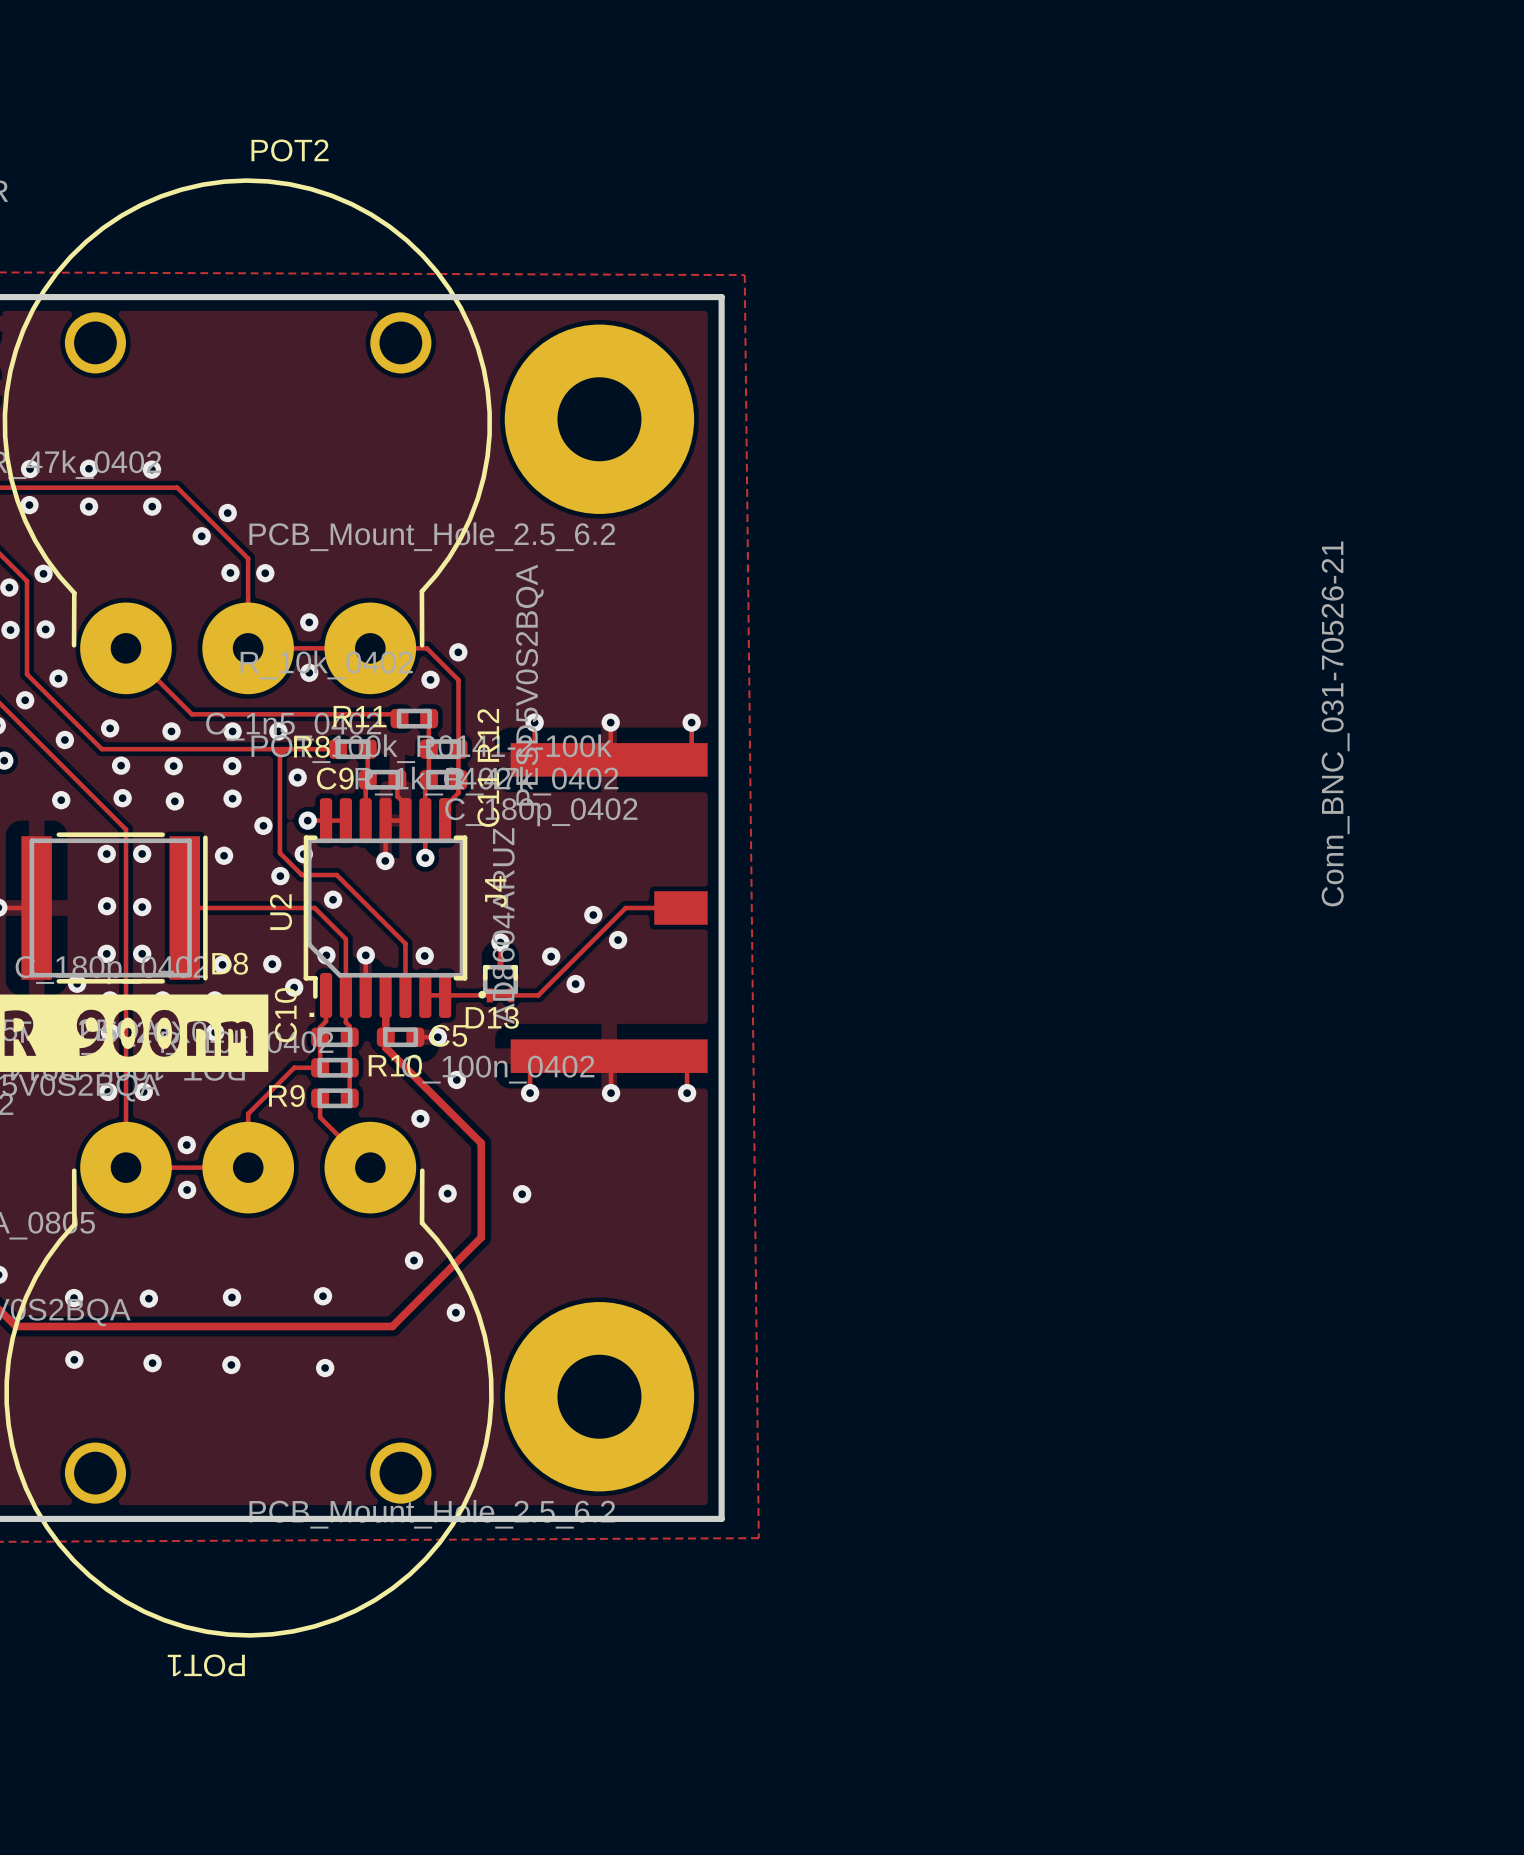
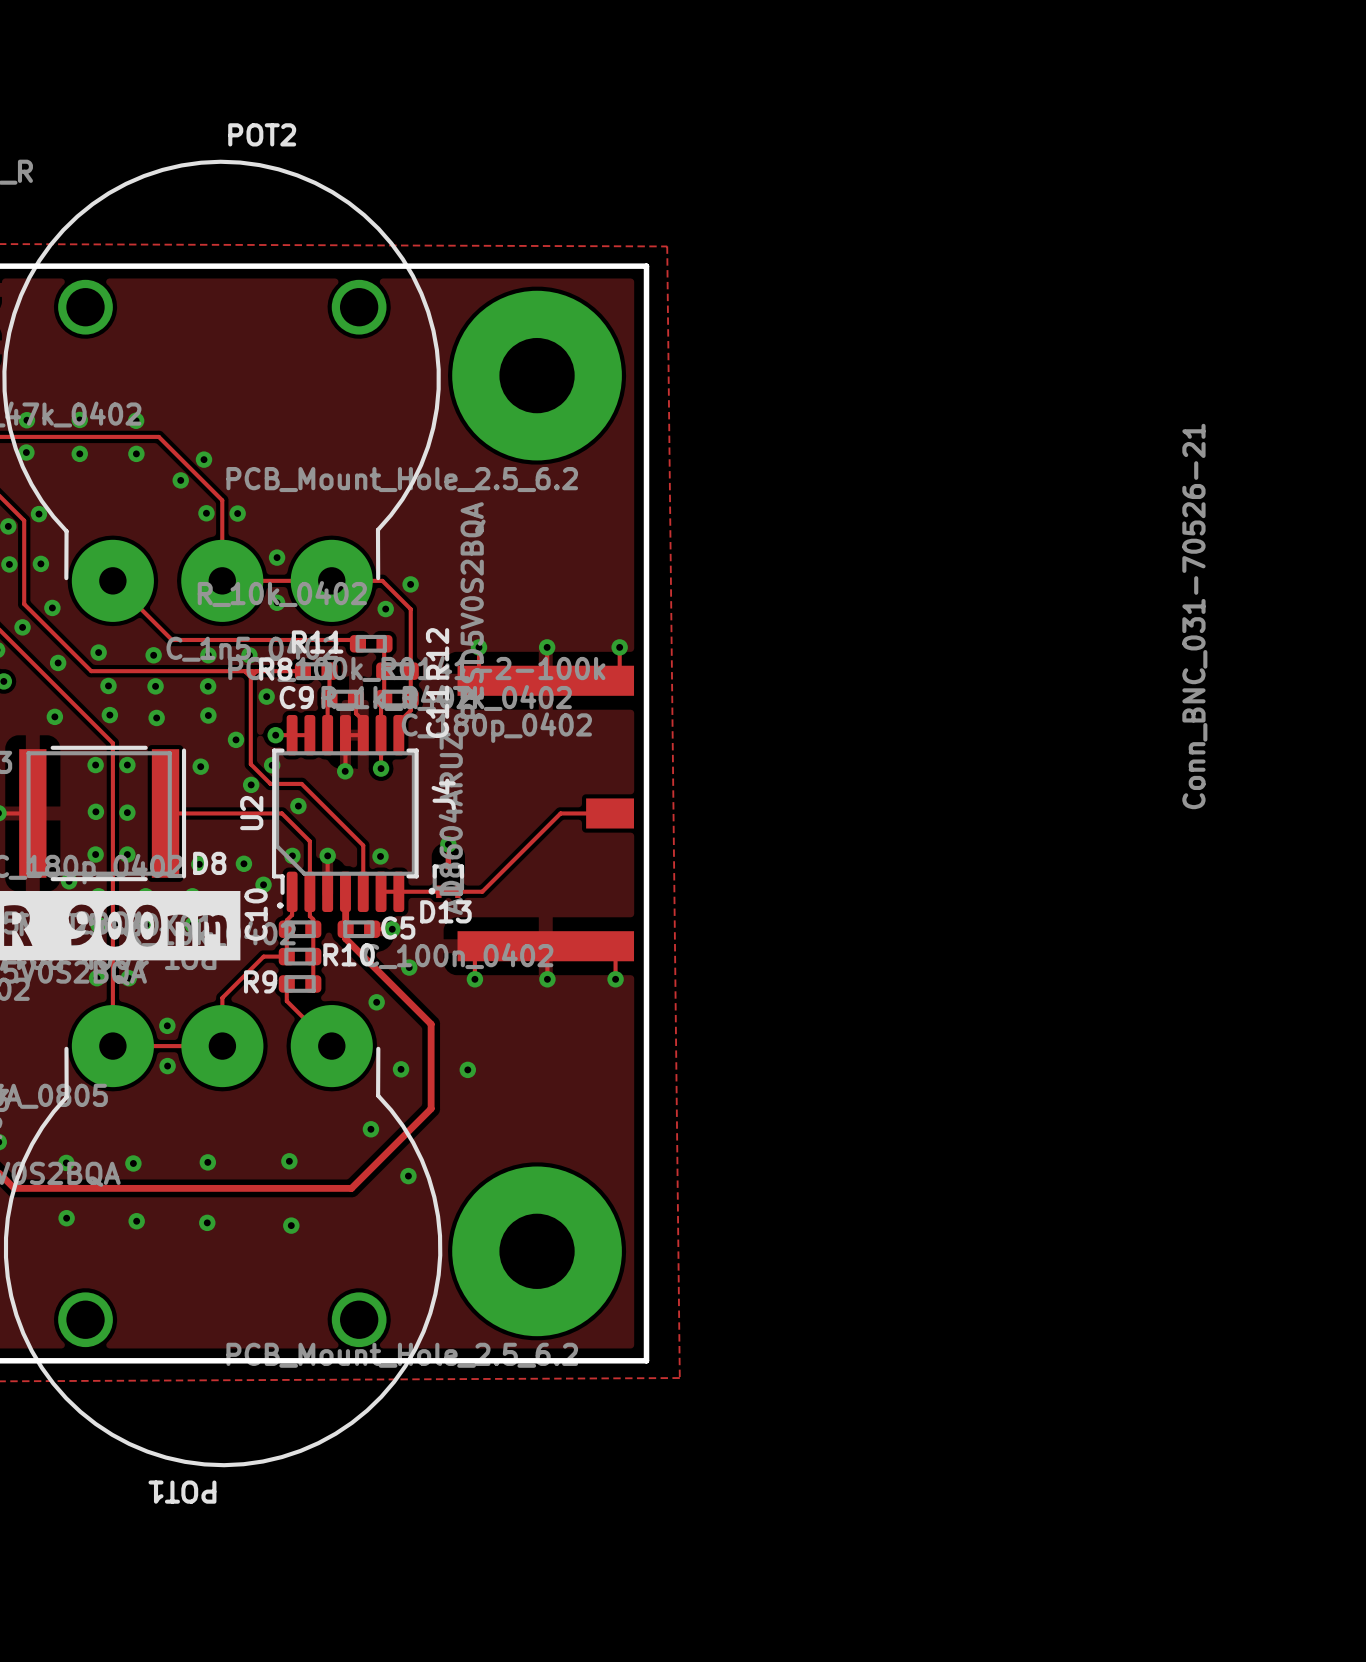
via: (593, 915) -> none
via: (618, 940) -> none
via: (551, 956) -> none
via: (575, 984) -> none

